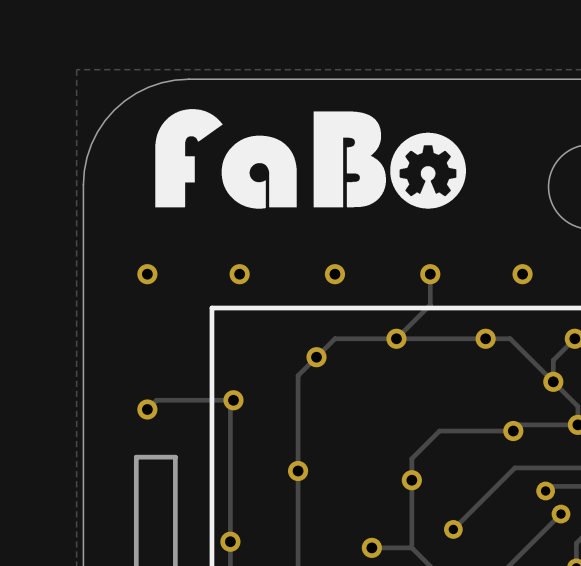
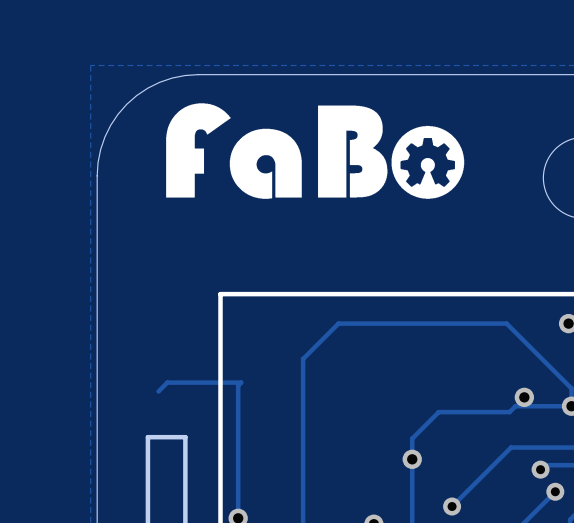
via: (147, 274) -> none
via: (239, 274) -> none
via: (334, 274) -> none
track: (430, 274) (430, 304) (396, 338) -> none
via: (430, 274) -> none
via: (522, 274) -> none
via: (396, 338) -> none
via: (485, 338) -> none
track: (574, 338) (553, 360) (553, 381) -> none
via: (316, 357) -> none
via: (553, 381) -> none
via: (233, 400) -> none
via: (147, 409) -> none
via position: (513, 431) -> (524, 397)
via: (298, 471) -> none

